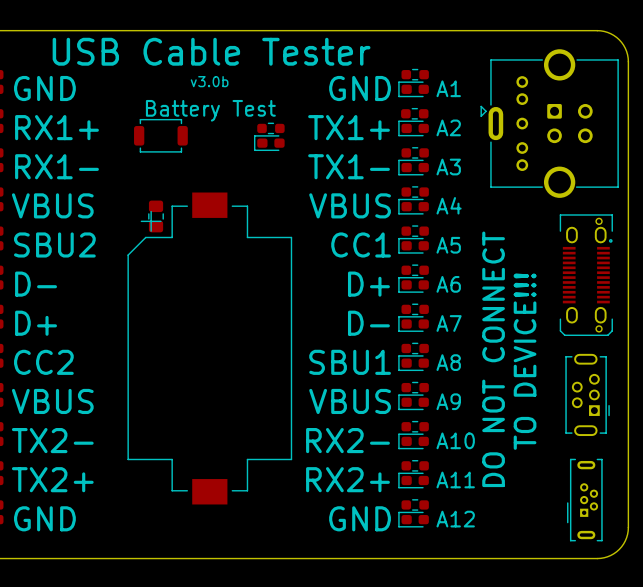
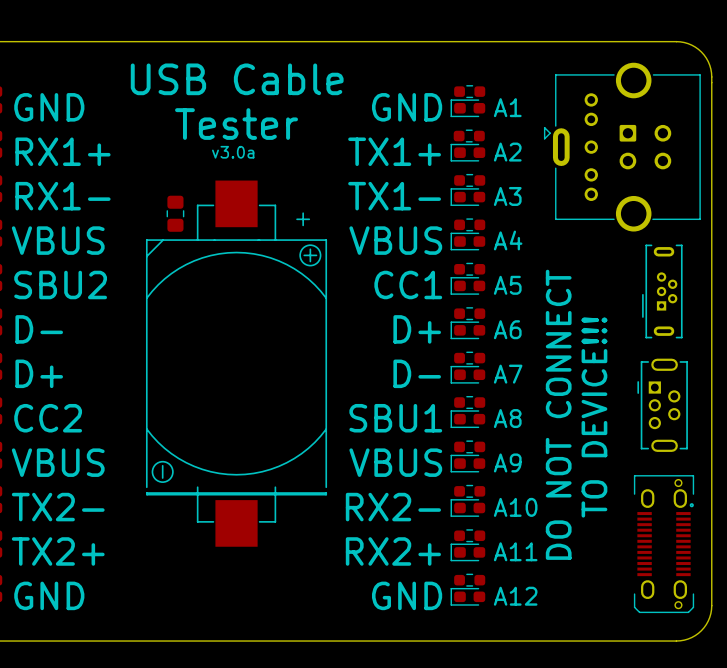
text: USB Cable Tester (211, 51) -> USB Cable (237, 79)
text: v3.0b (209, 81) -> none
text: Battery Test (210, 110) -> Tester (236, 124)
text: none -> v3.0a (233, 152)
part: (270, 128) -> none
part: (160, 135) -> none
part: (269, 143) -> none
part position: (156, 216) -> (175, 213)
part: none -> (662, 291)
part position: (586, 275) -> (664, 544)
part: none -> (236, 363)
part: (209, 348) -> none
part rotation: 0° (587, 394) -> 180° (662, 405)
part: (584, 500) -> none

